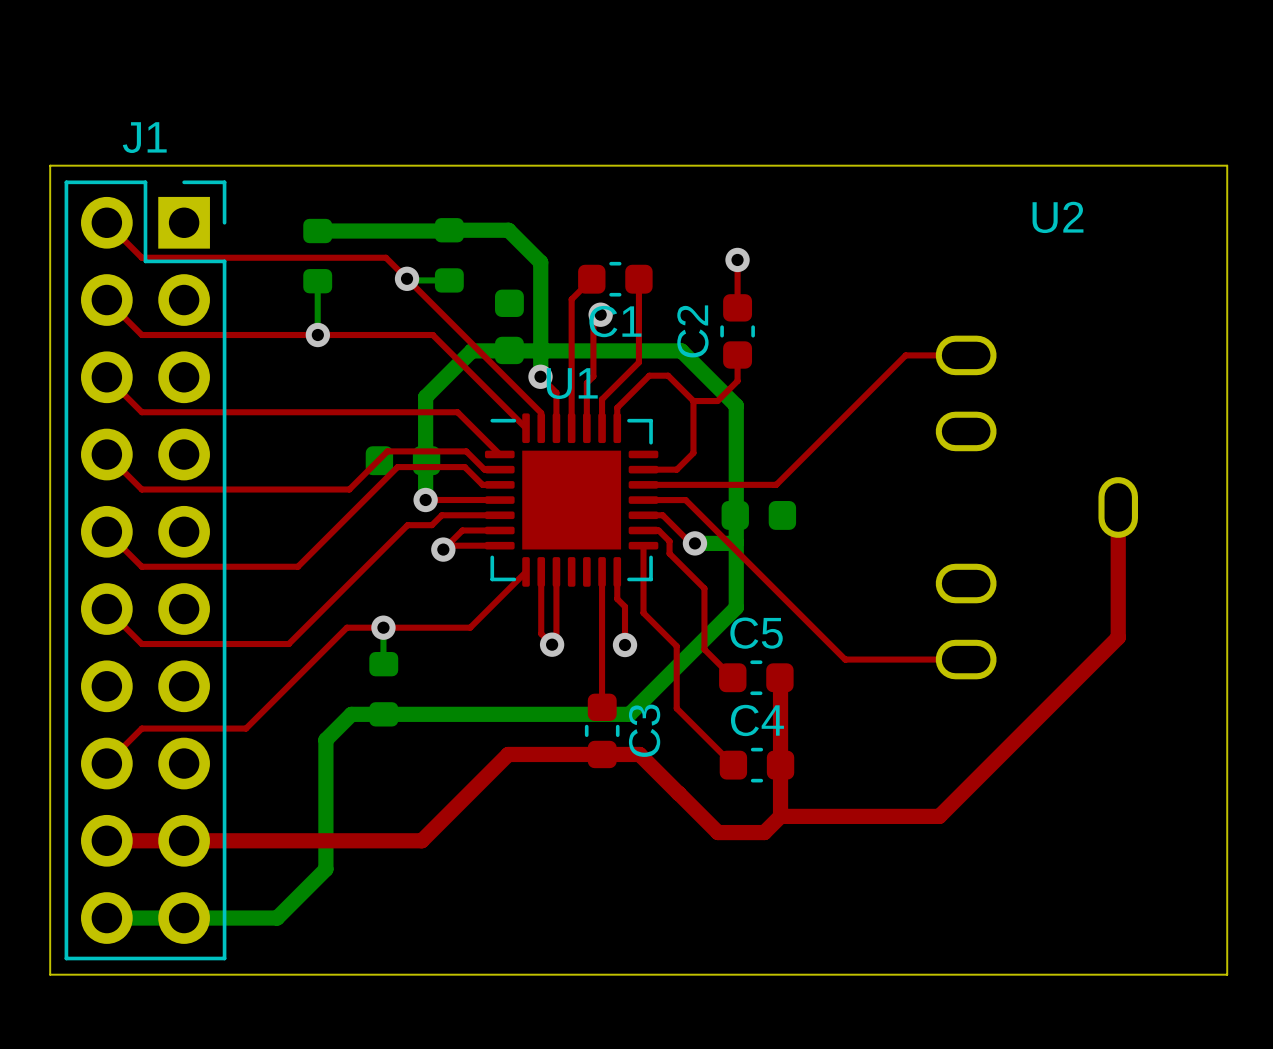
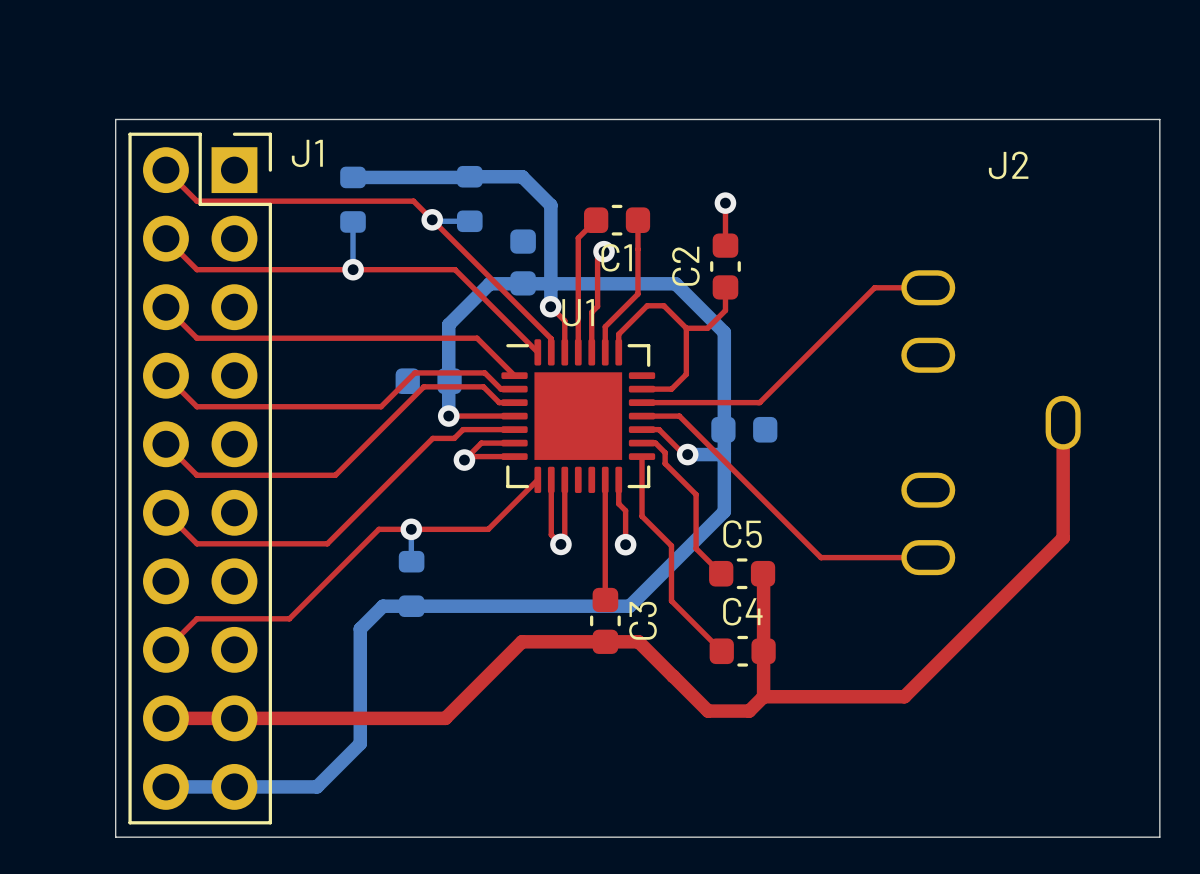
J1 name position: J1 (144, 137) -> J1 (307, 153)
U2 name: U2 (1058, 217) -> J2 (1008, 165)

